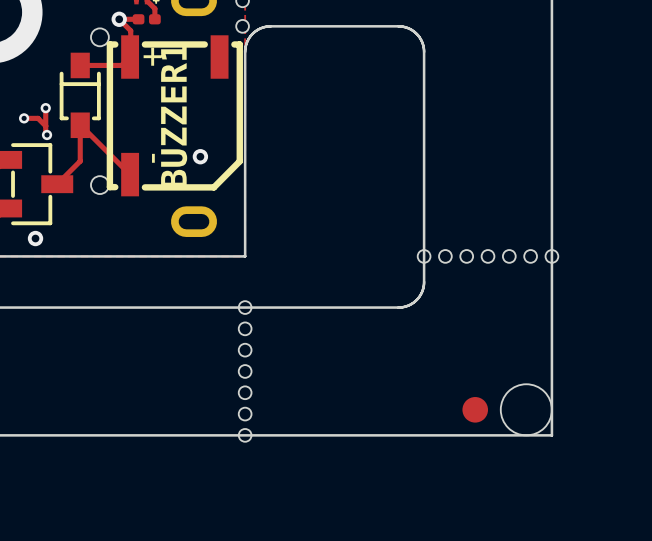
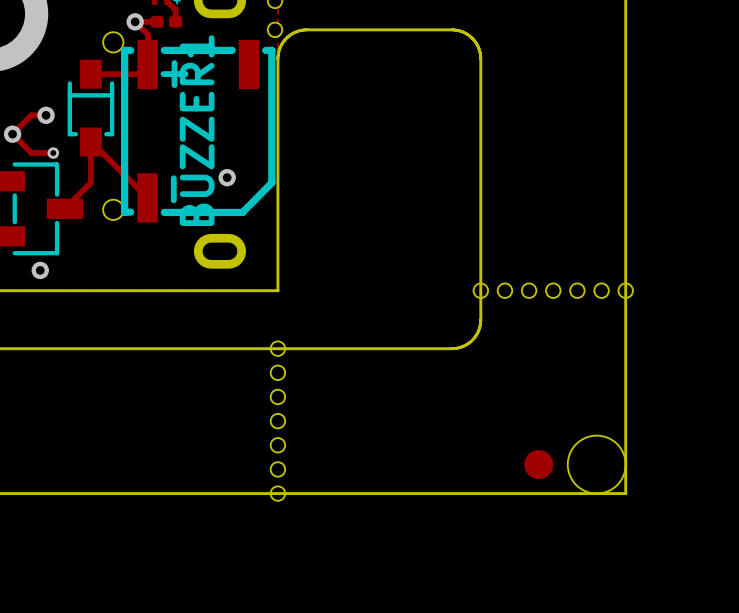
via size: [40, 103, 51, 114] -> [37, 106, 55, 125]
track: (45, 108) (47, 134) -> (46, 115) (31, 115) (12, 134) (31, 153) (53, 153)
via: none -> (12, 134)
track: (24, 118) (38, 118) (45, 126) -> none
via: (24, 118) -> none

